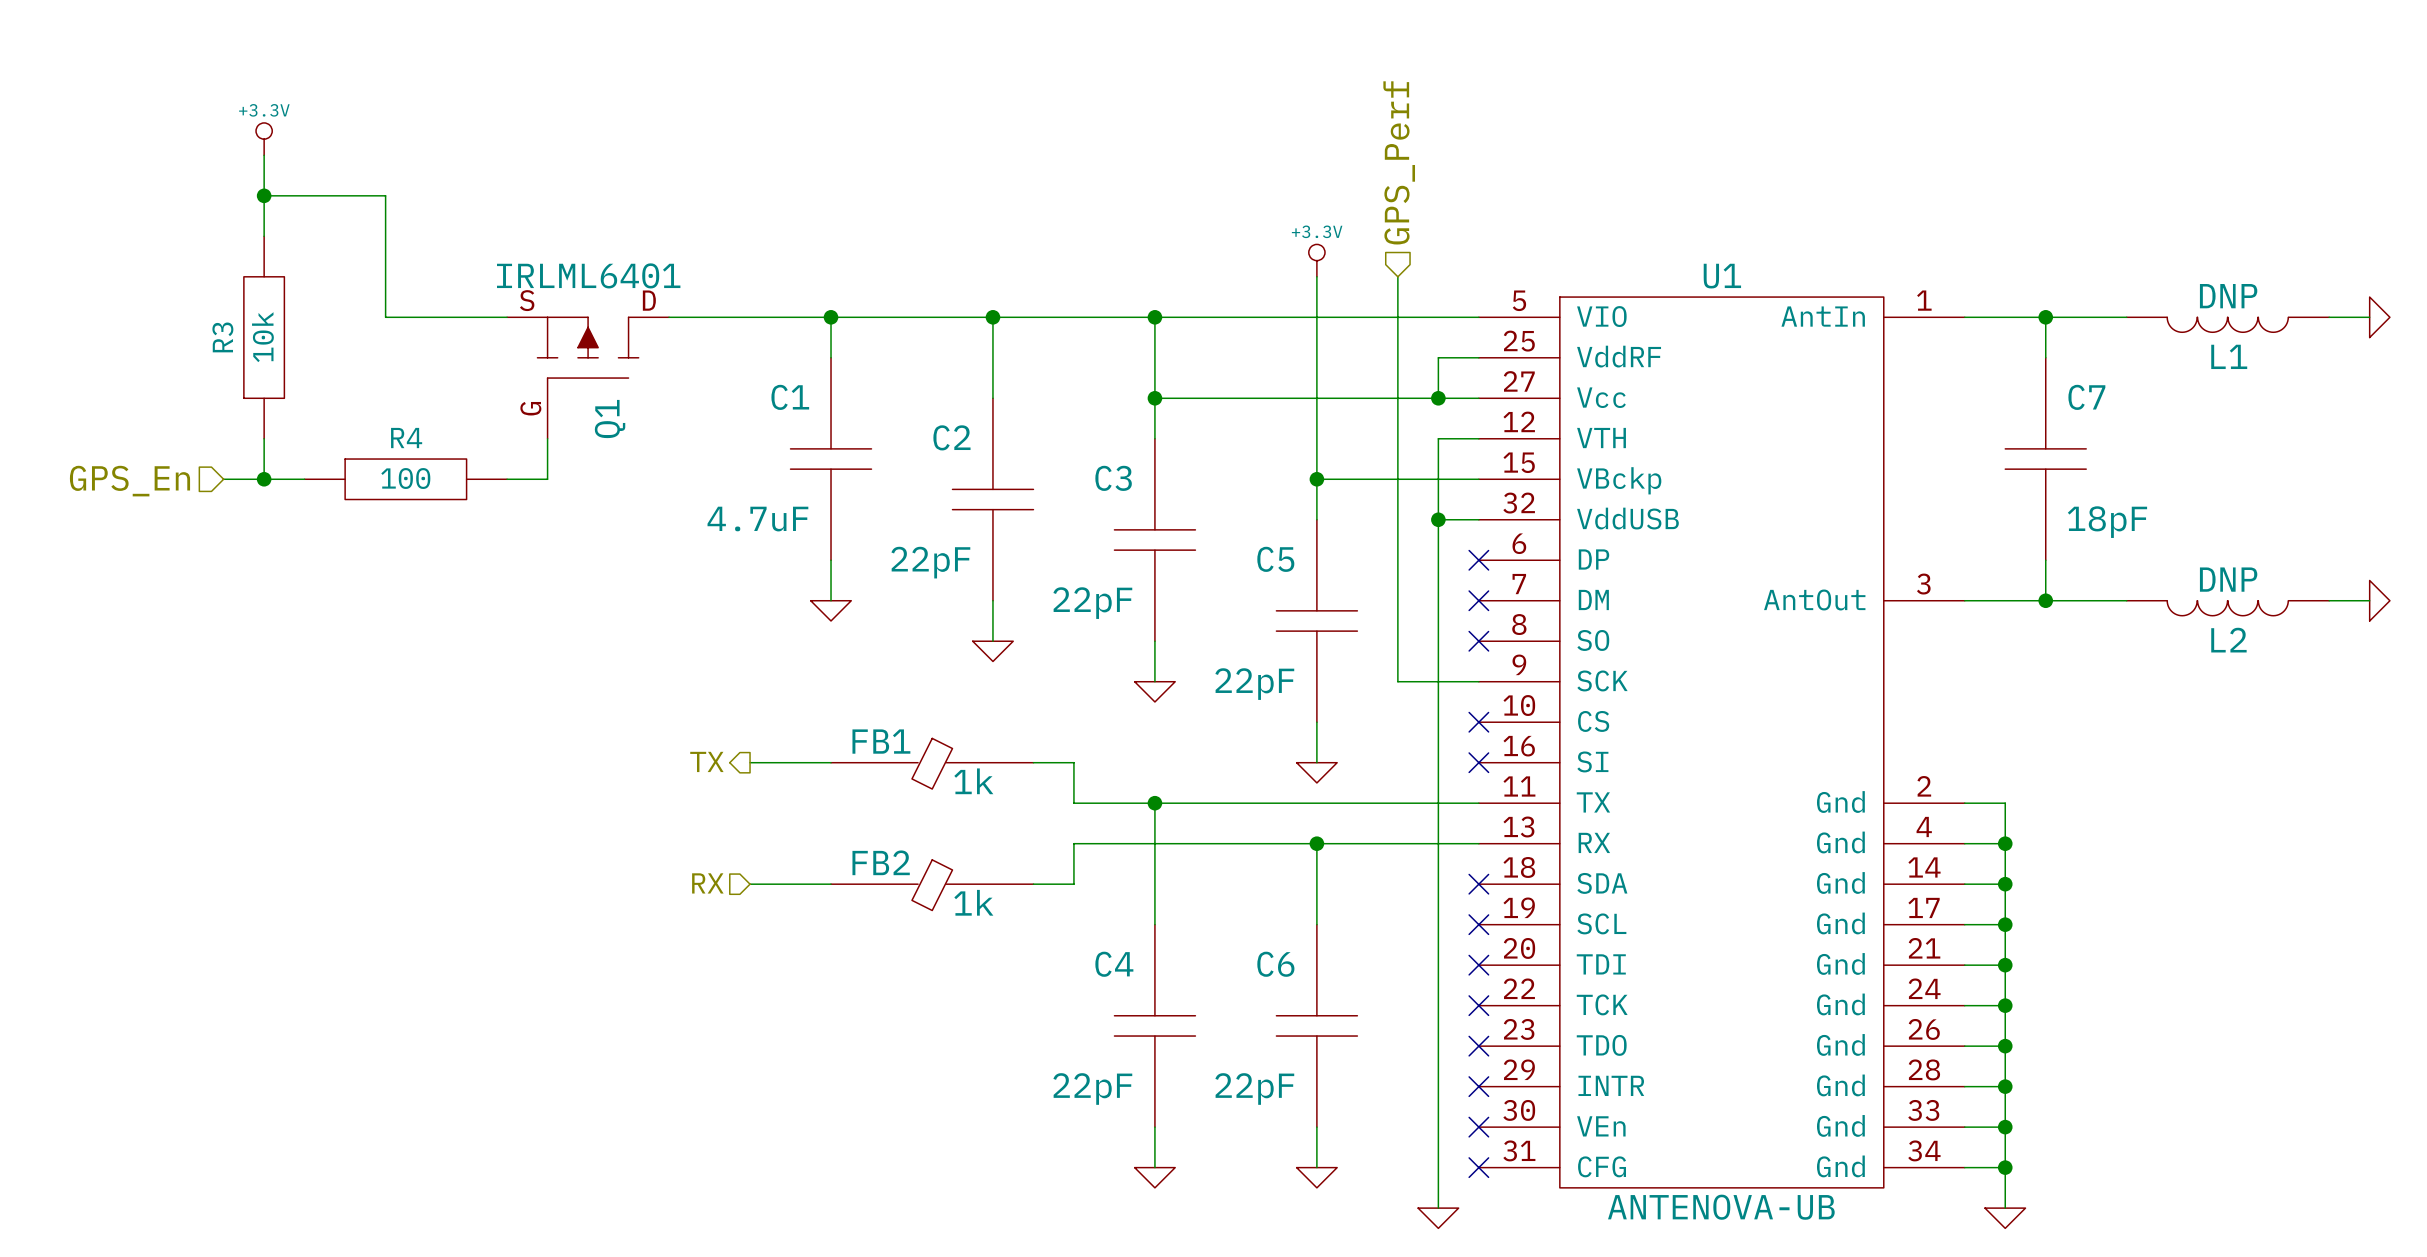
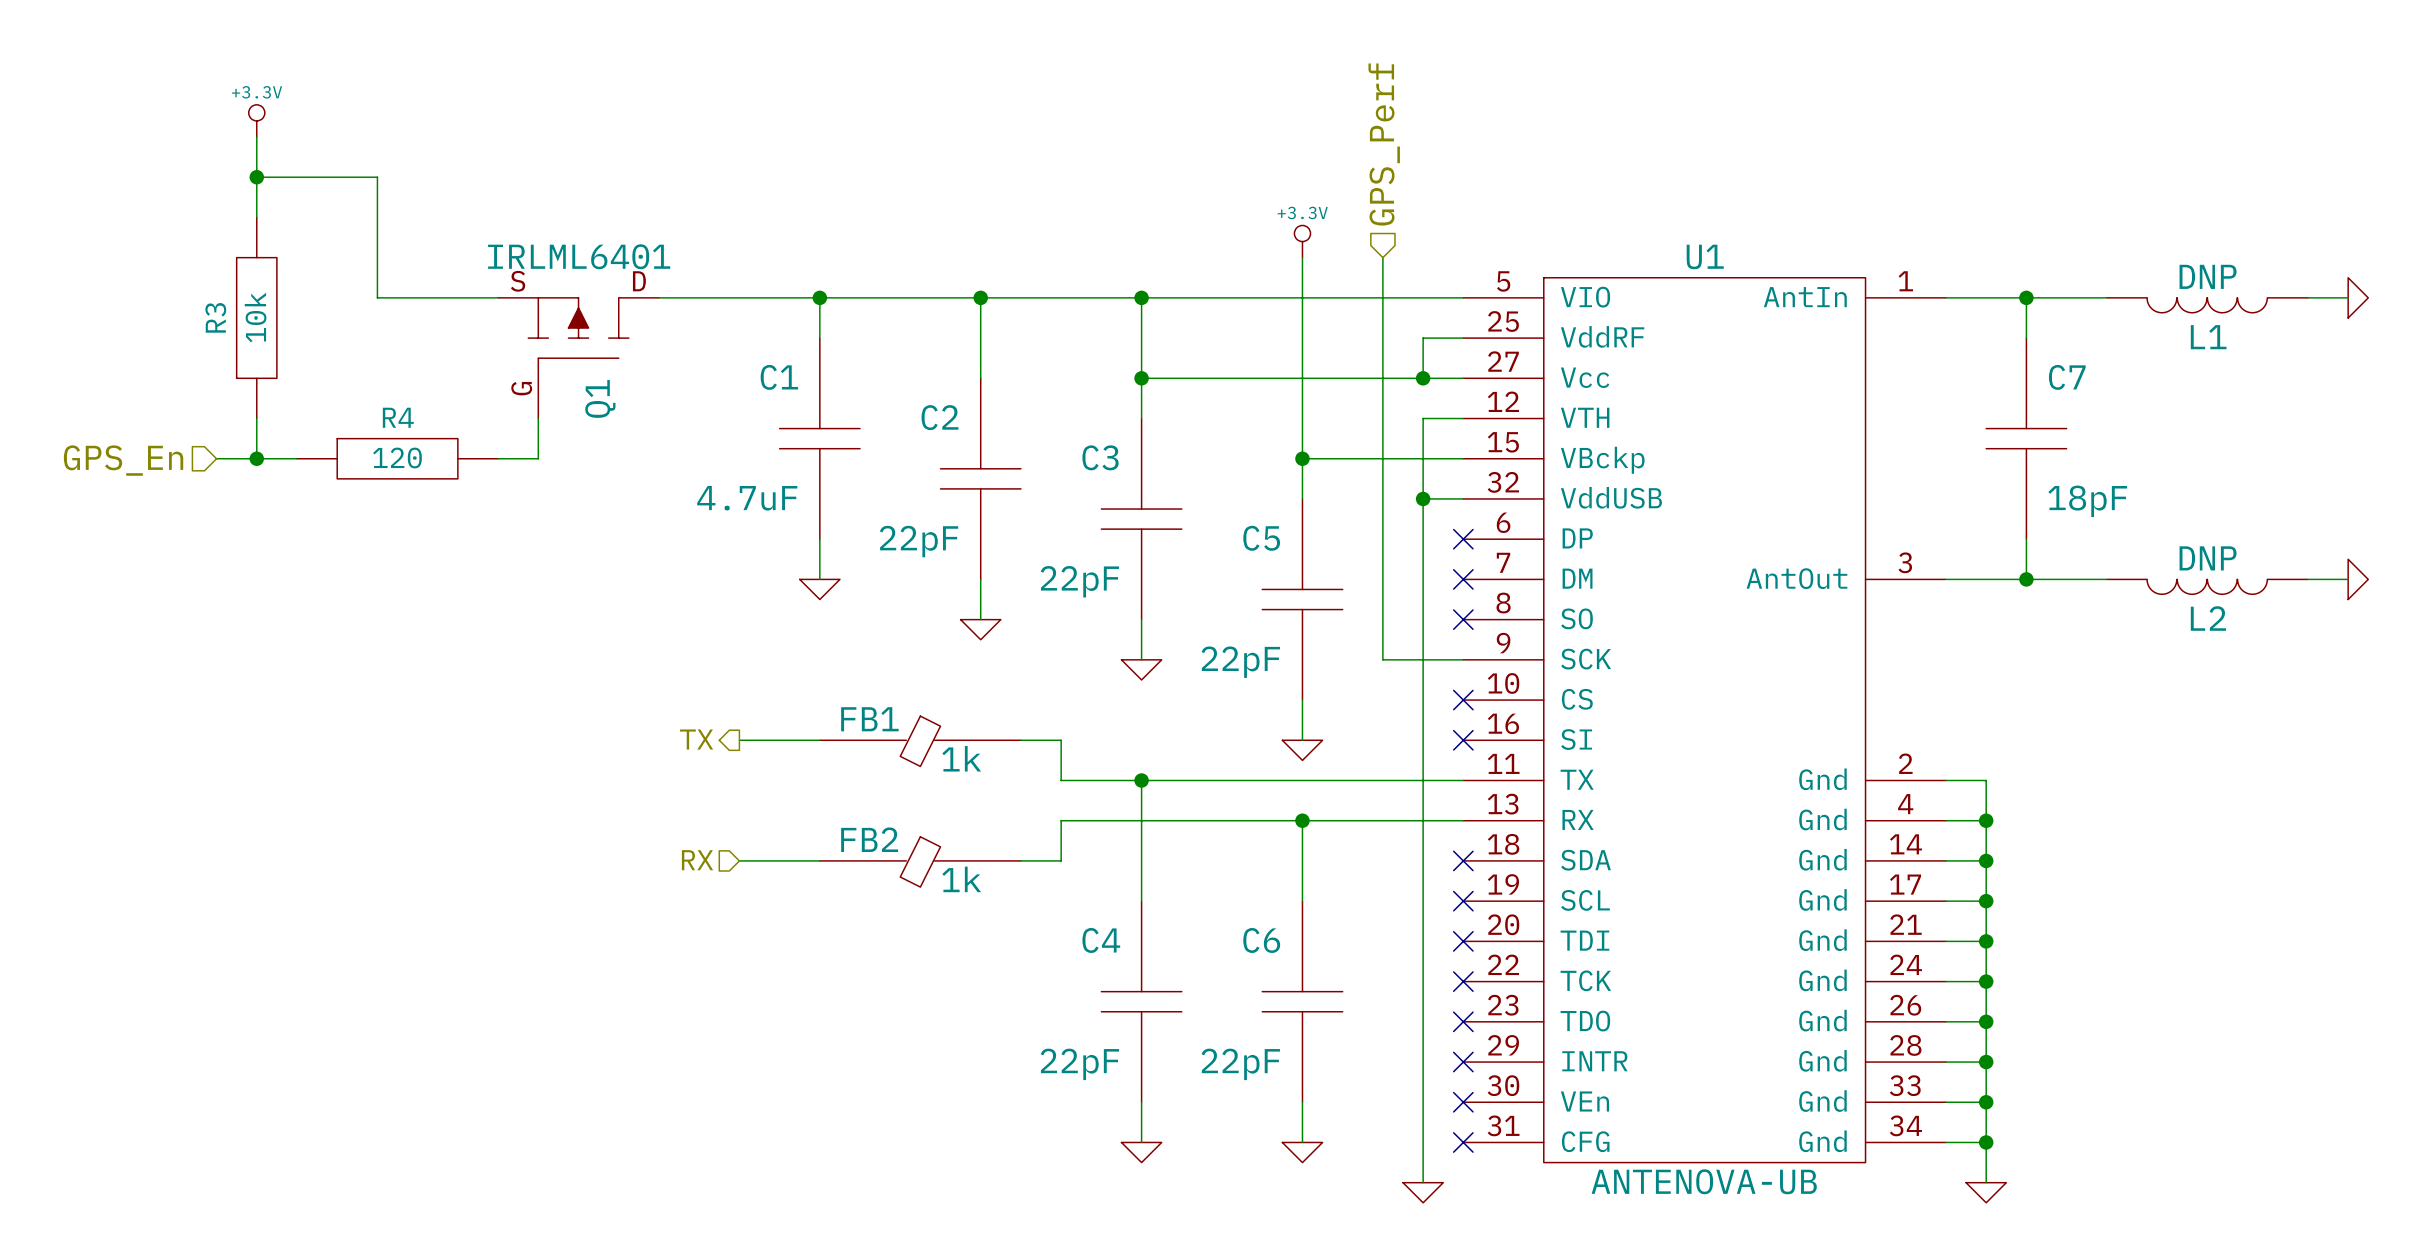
R4 value: 100 (405, 478) -> 120 (397, 458)

